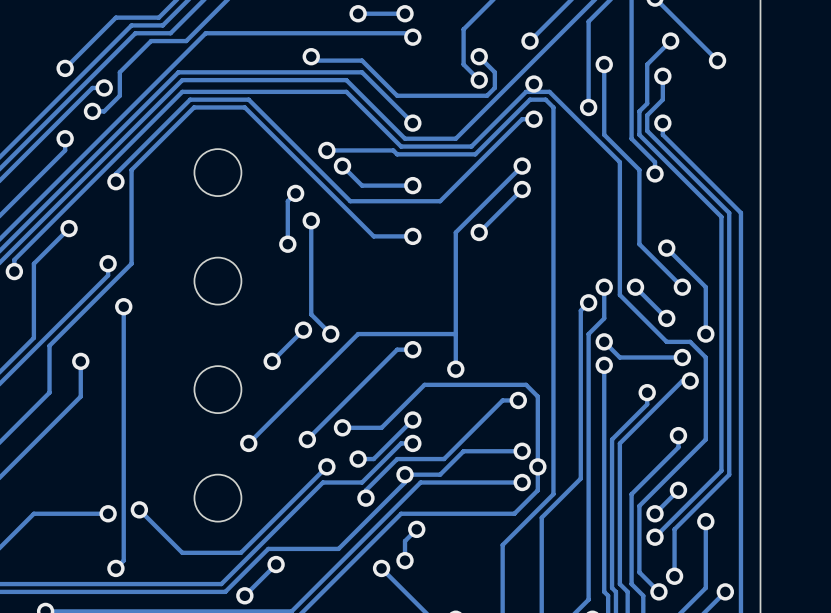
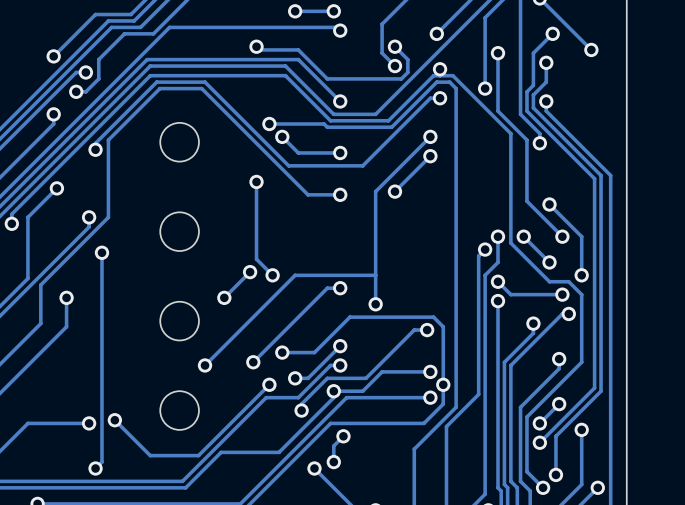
track: (295, 193) (287, 201) (287, 244) -> none
via: (295, 193) -> none
via: (287, 244) -> none
track: (276, 564) (244, 595) -> none
via: (276, 564) -> none
via: (244, 595) -> none

